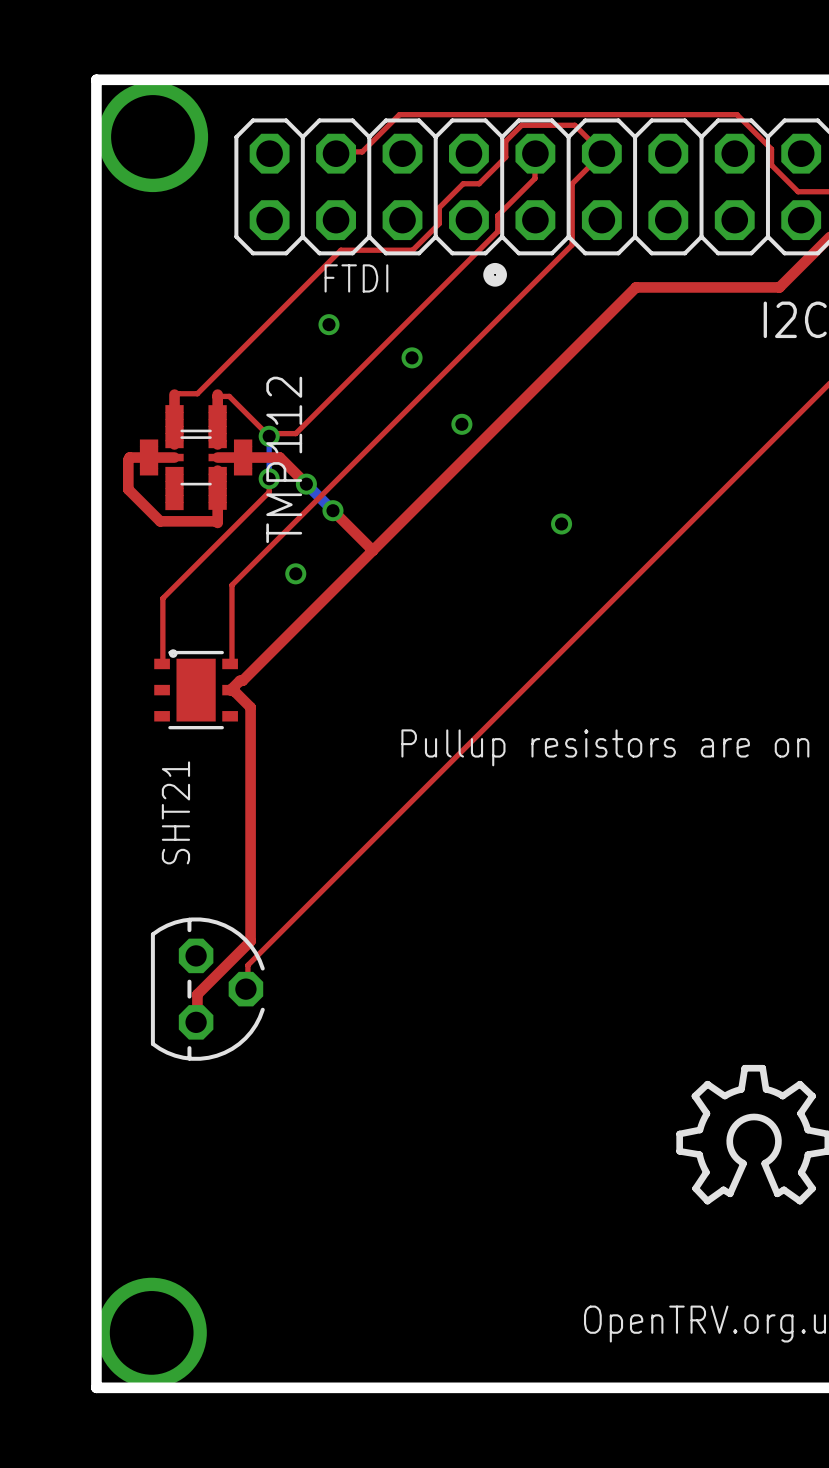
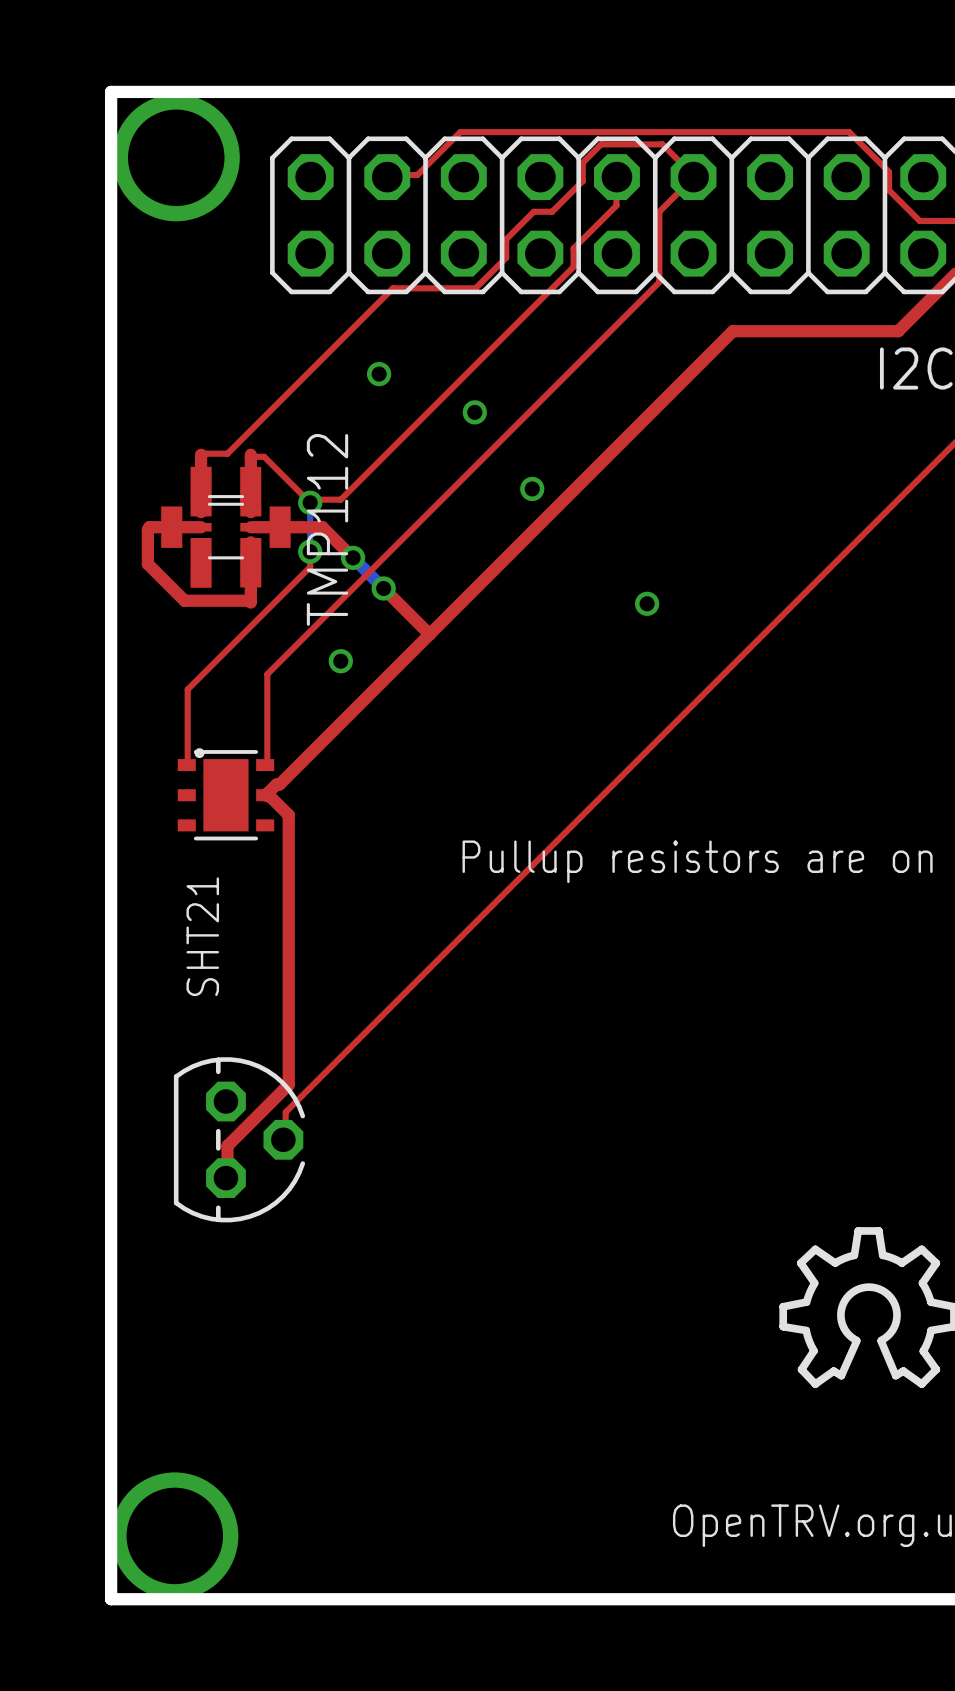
drawing: [483, 262, 507, 287] -> none
text: FTDI (356, 278) -> none

